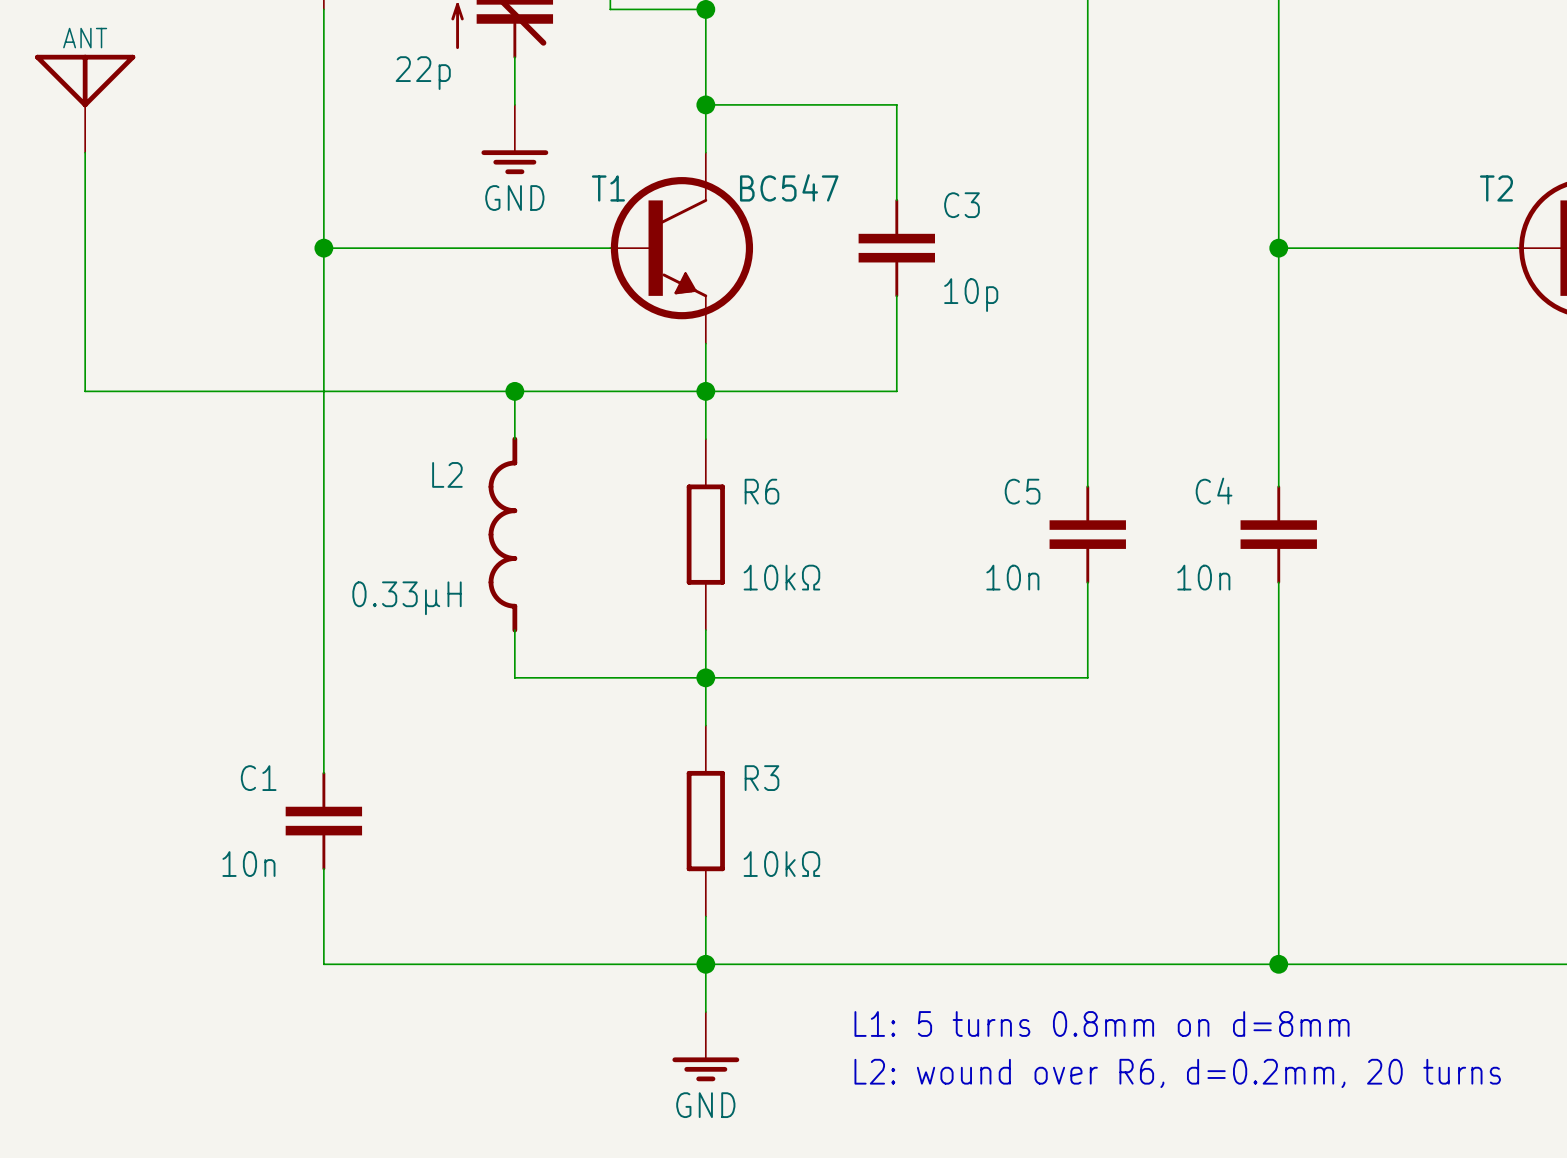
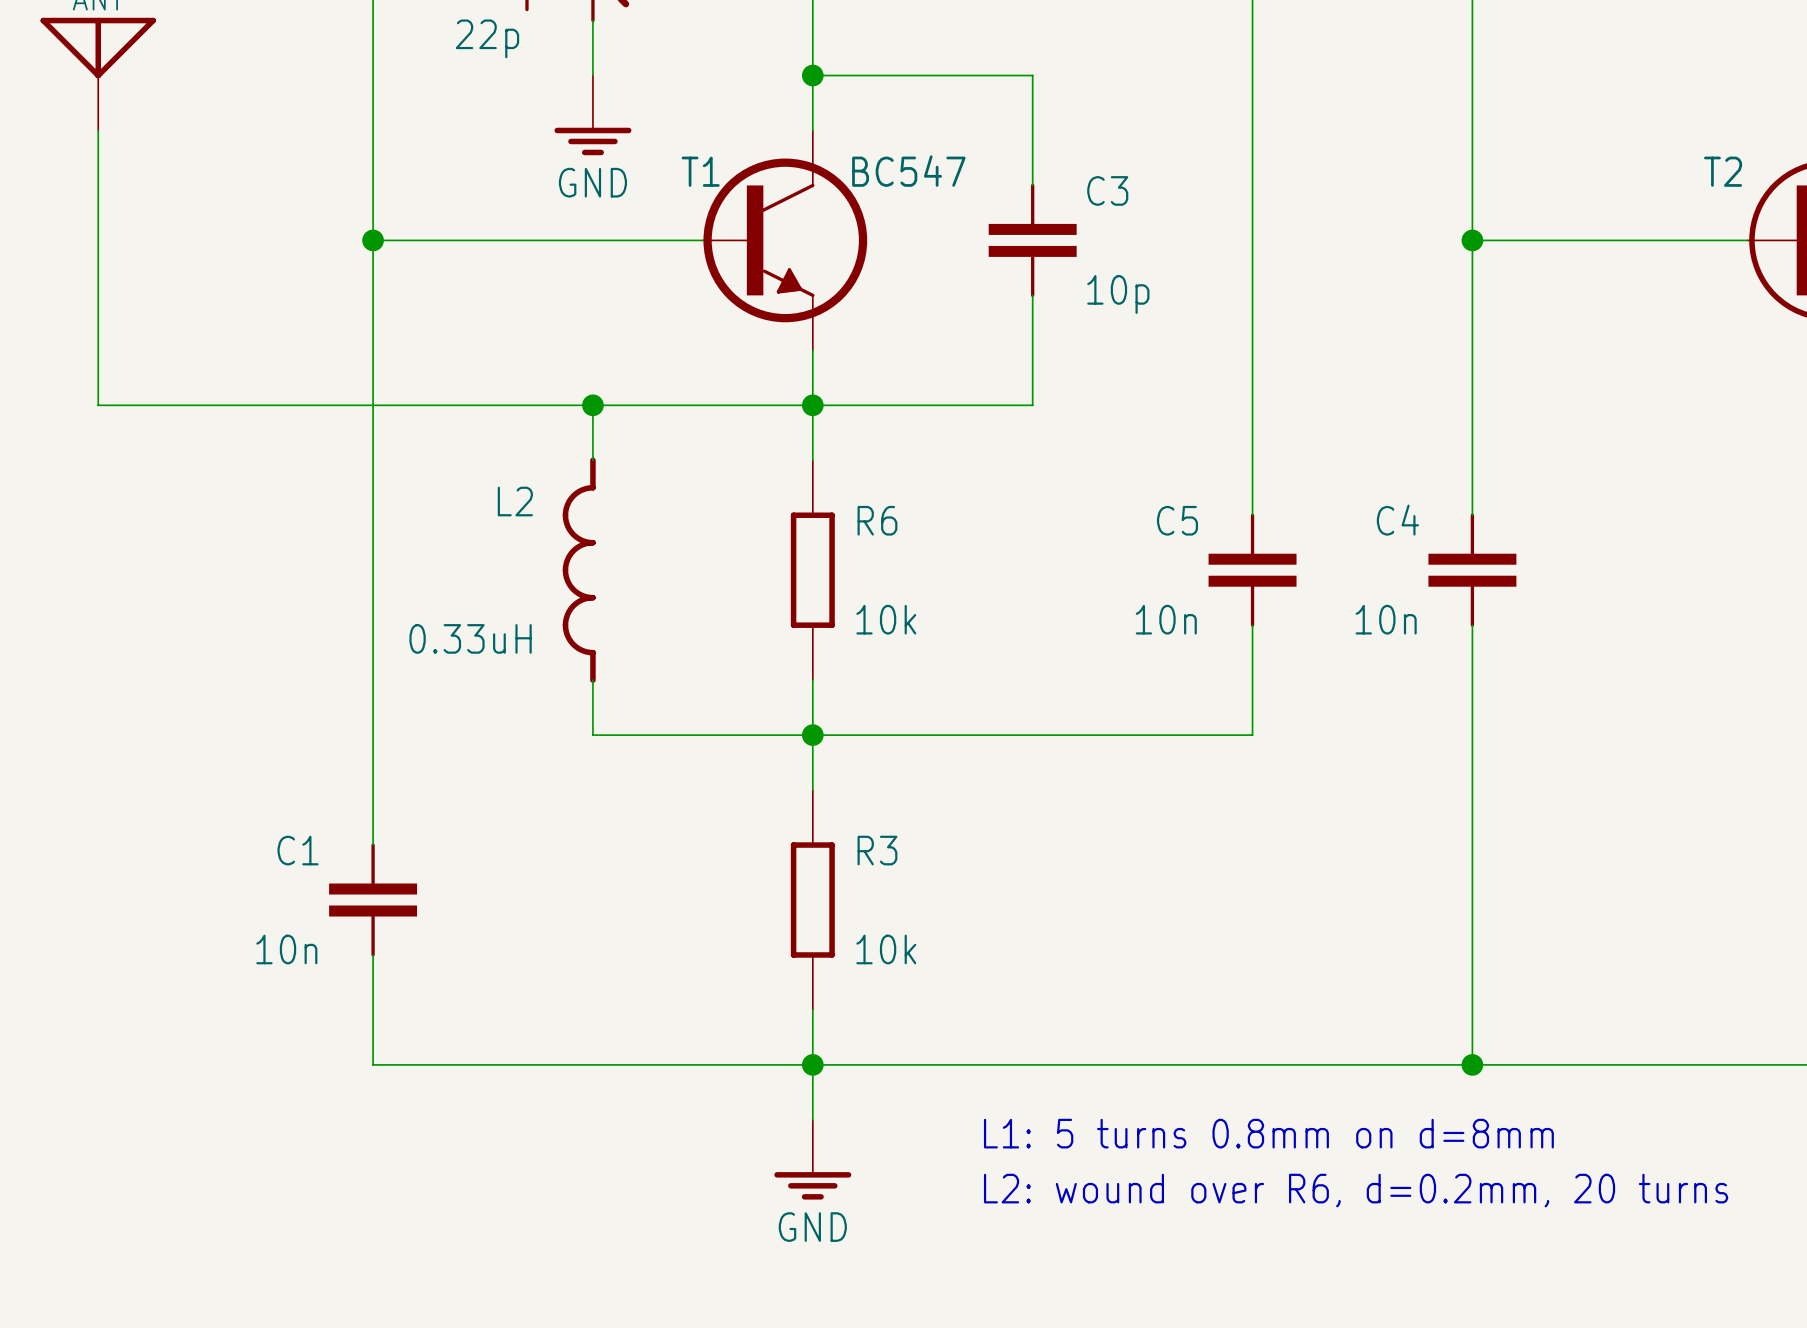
R6 value: 10kΩ (781, 577) -> 10k (886, 619)
L2 value: 0.33μH (407, 598) -> 0.33uH (470, 638)
R3 value: 10kΩ (781, 864) -> 10k (886, 949)

